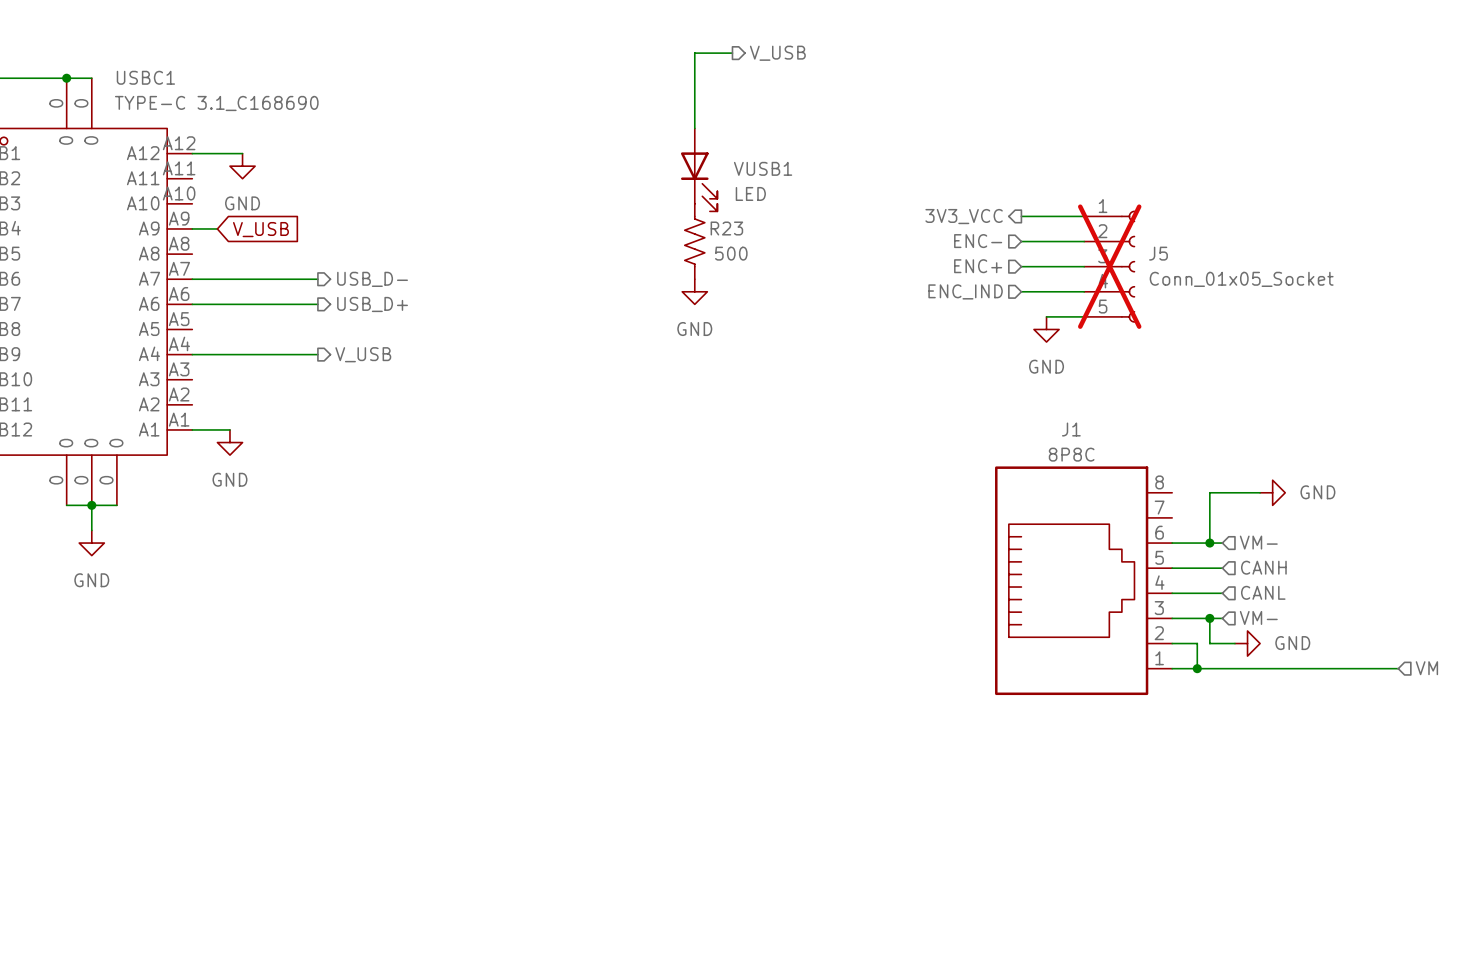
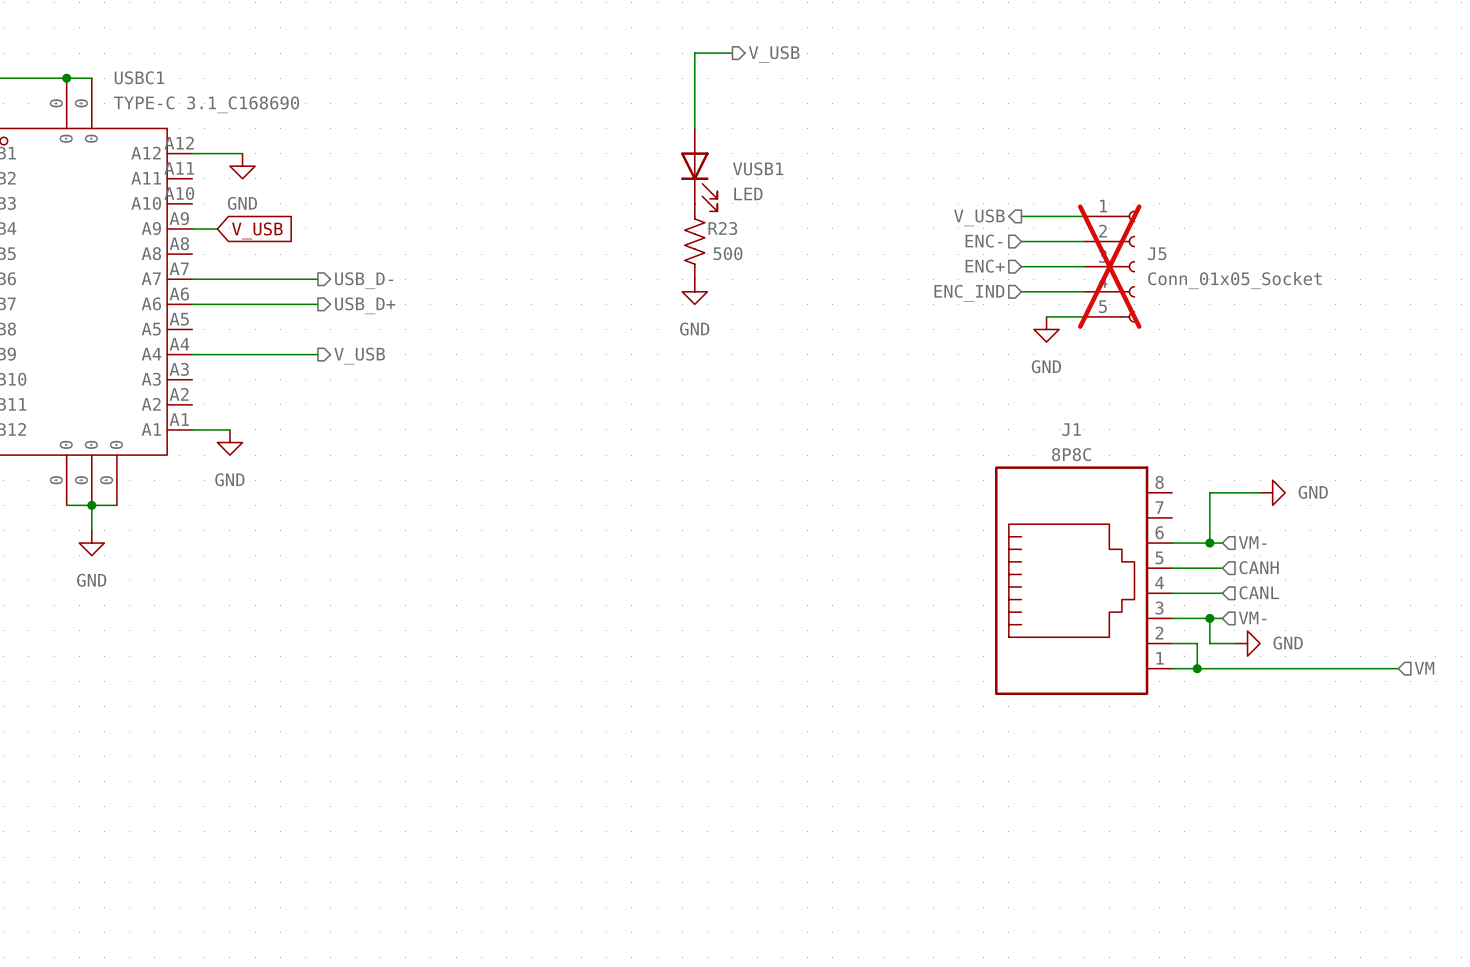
hierarchical label: 3V3_VCC (964, 216) -> V_USB (979, 217)

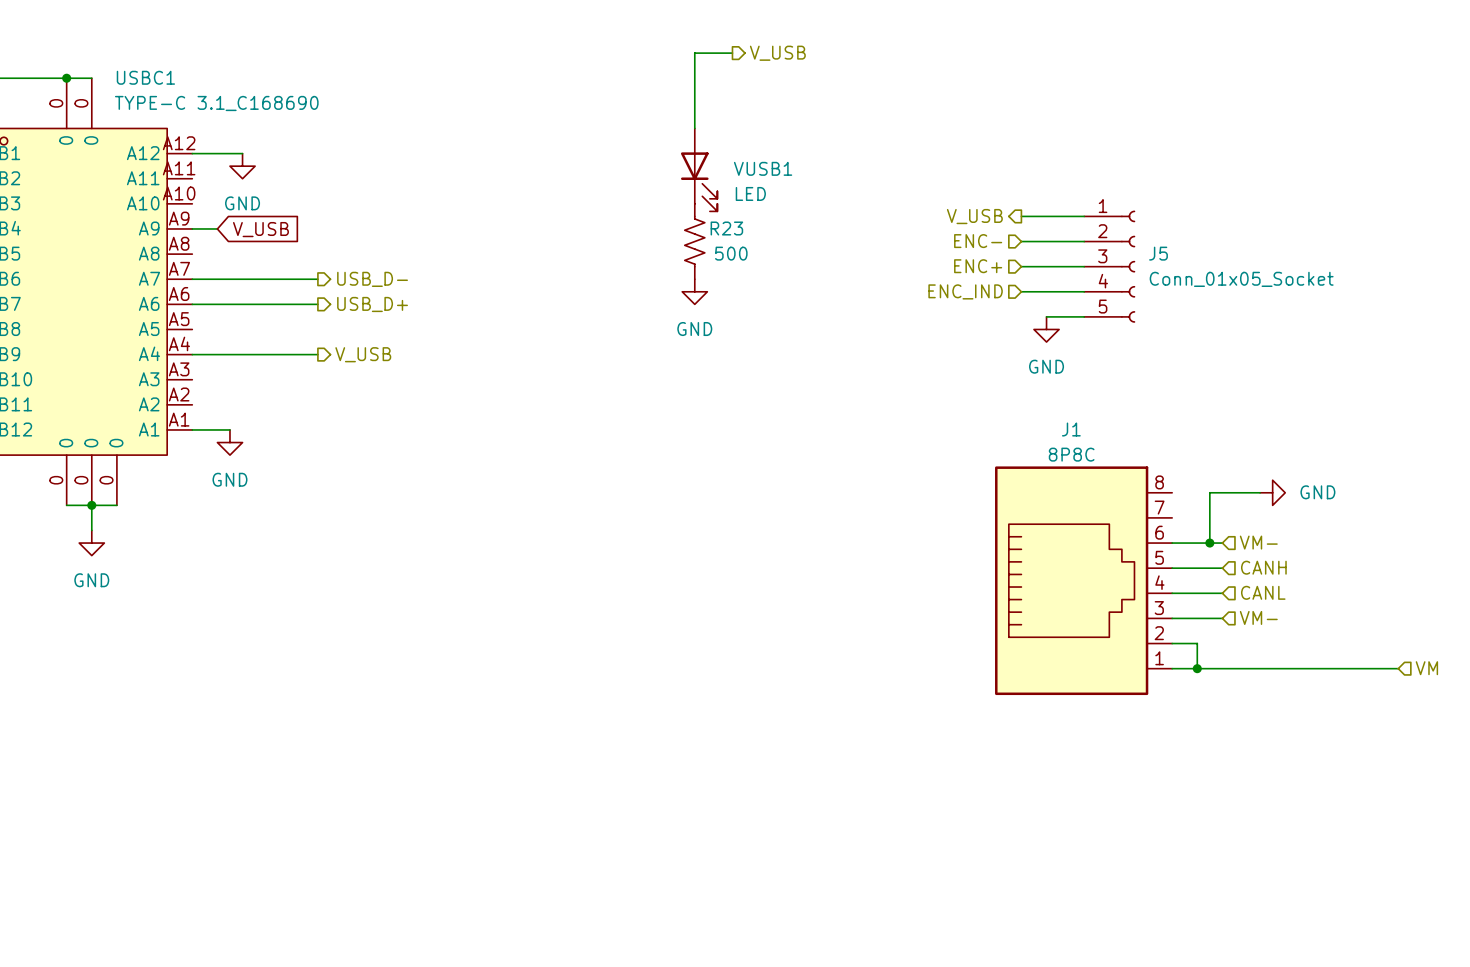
J5 do-not-place cross: (1109, 266) -> none
wire: (1209, 618) (1209, 643) (1234, 643) -> none
junction: (1209, 618) -> none
power symbol: GND (1247, 643) -> none

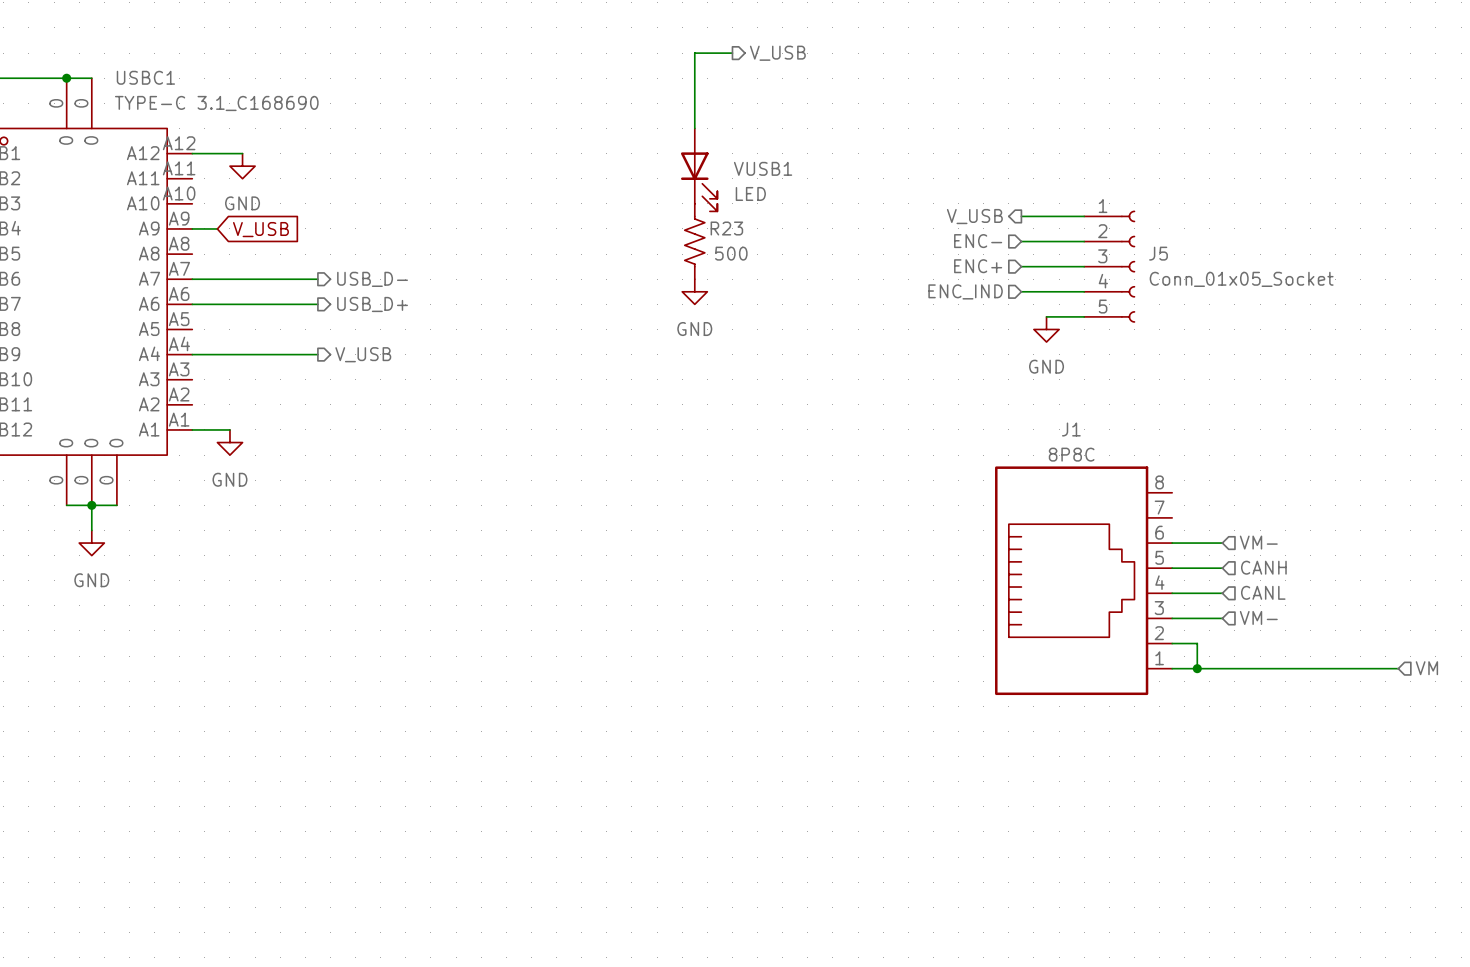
wire: (1260, 492) (1209, 492) (1209, 543) -> none
power symbol: GND (1272, 492) -> none
junction: (1209, 543) -> none

